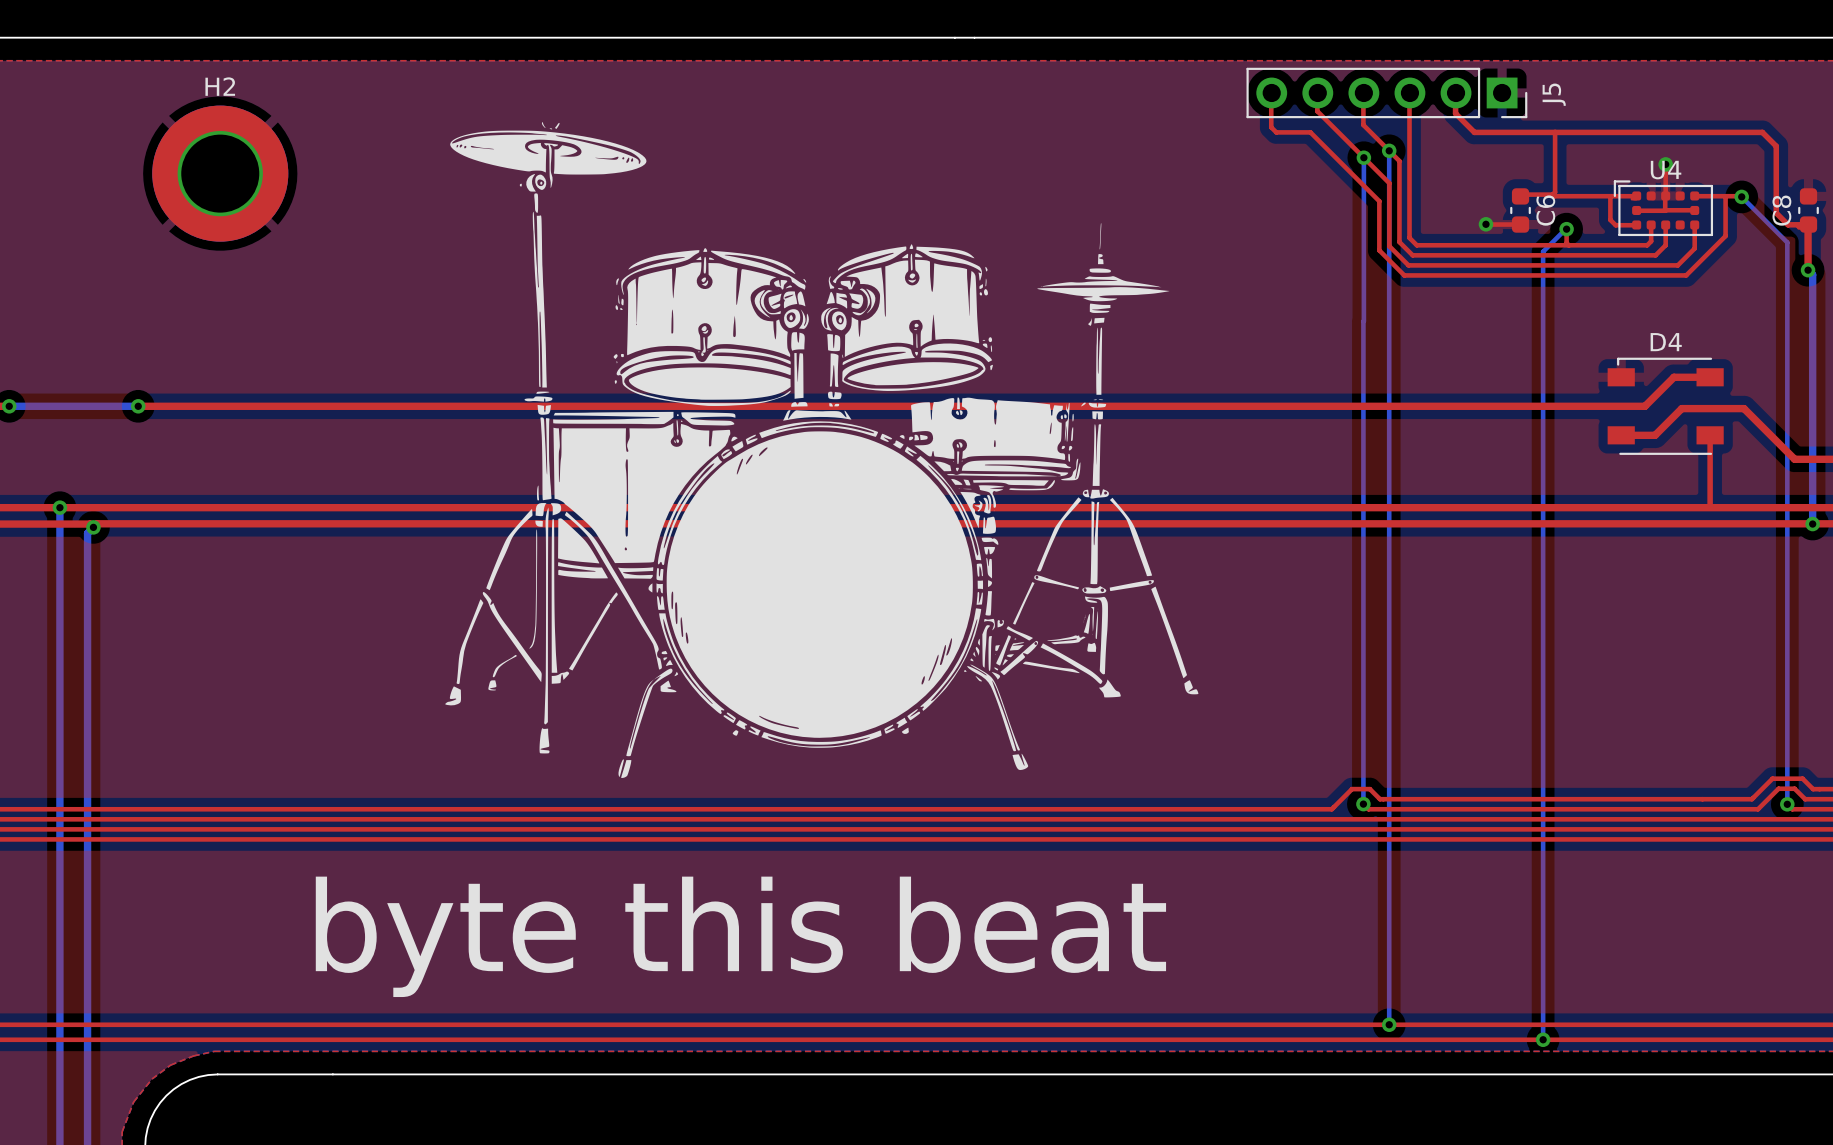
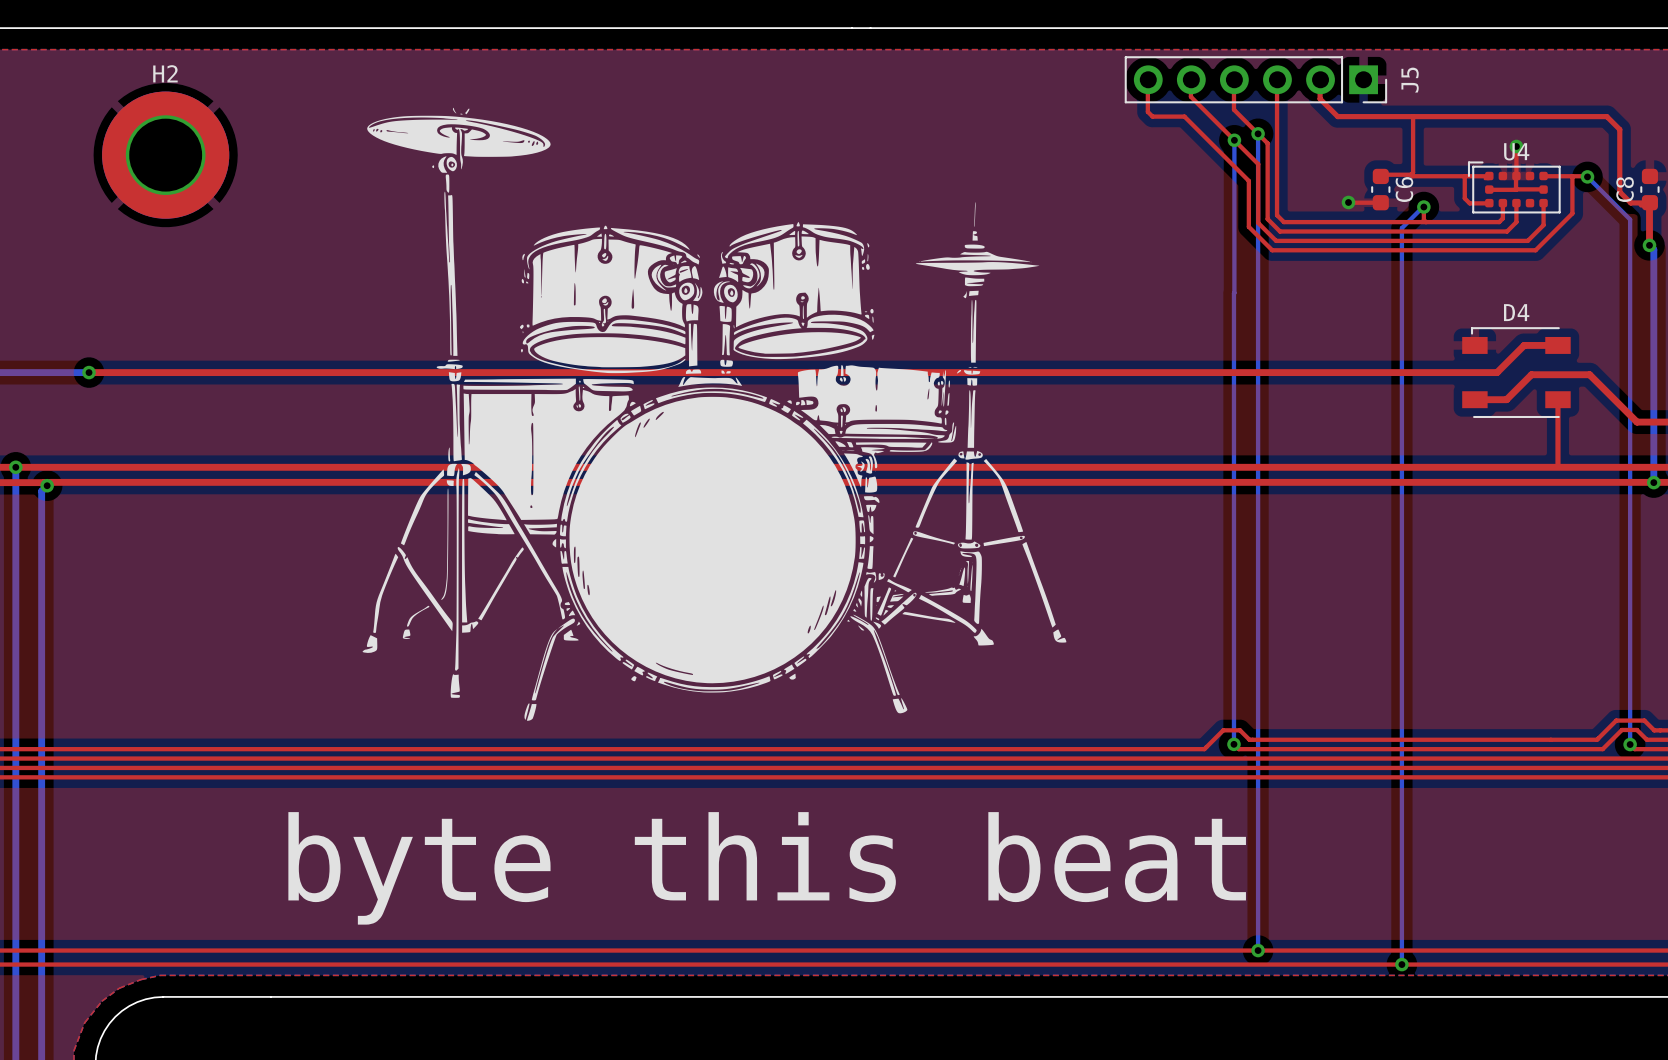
part position: (821, 449) -> (714, 414)

